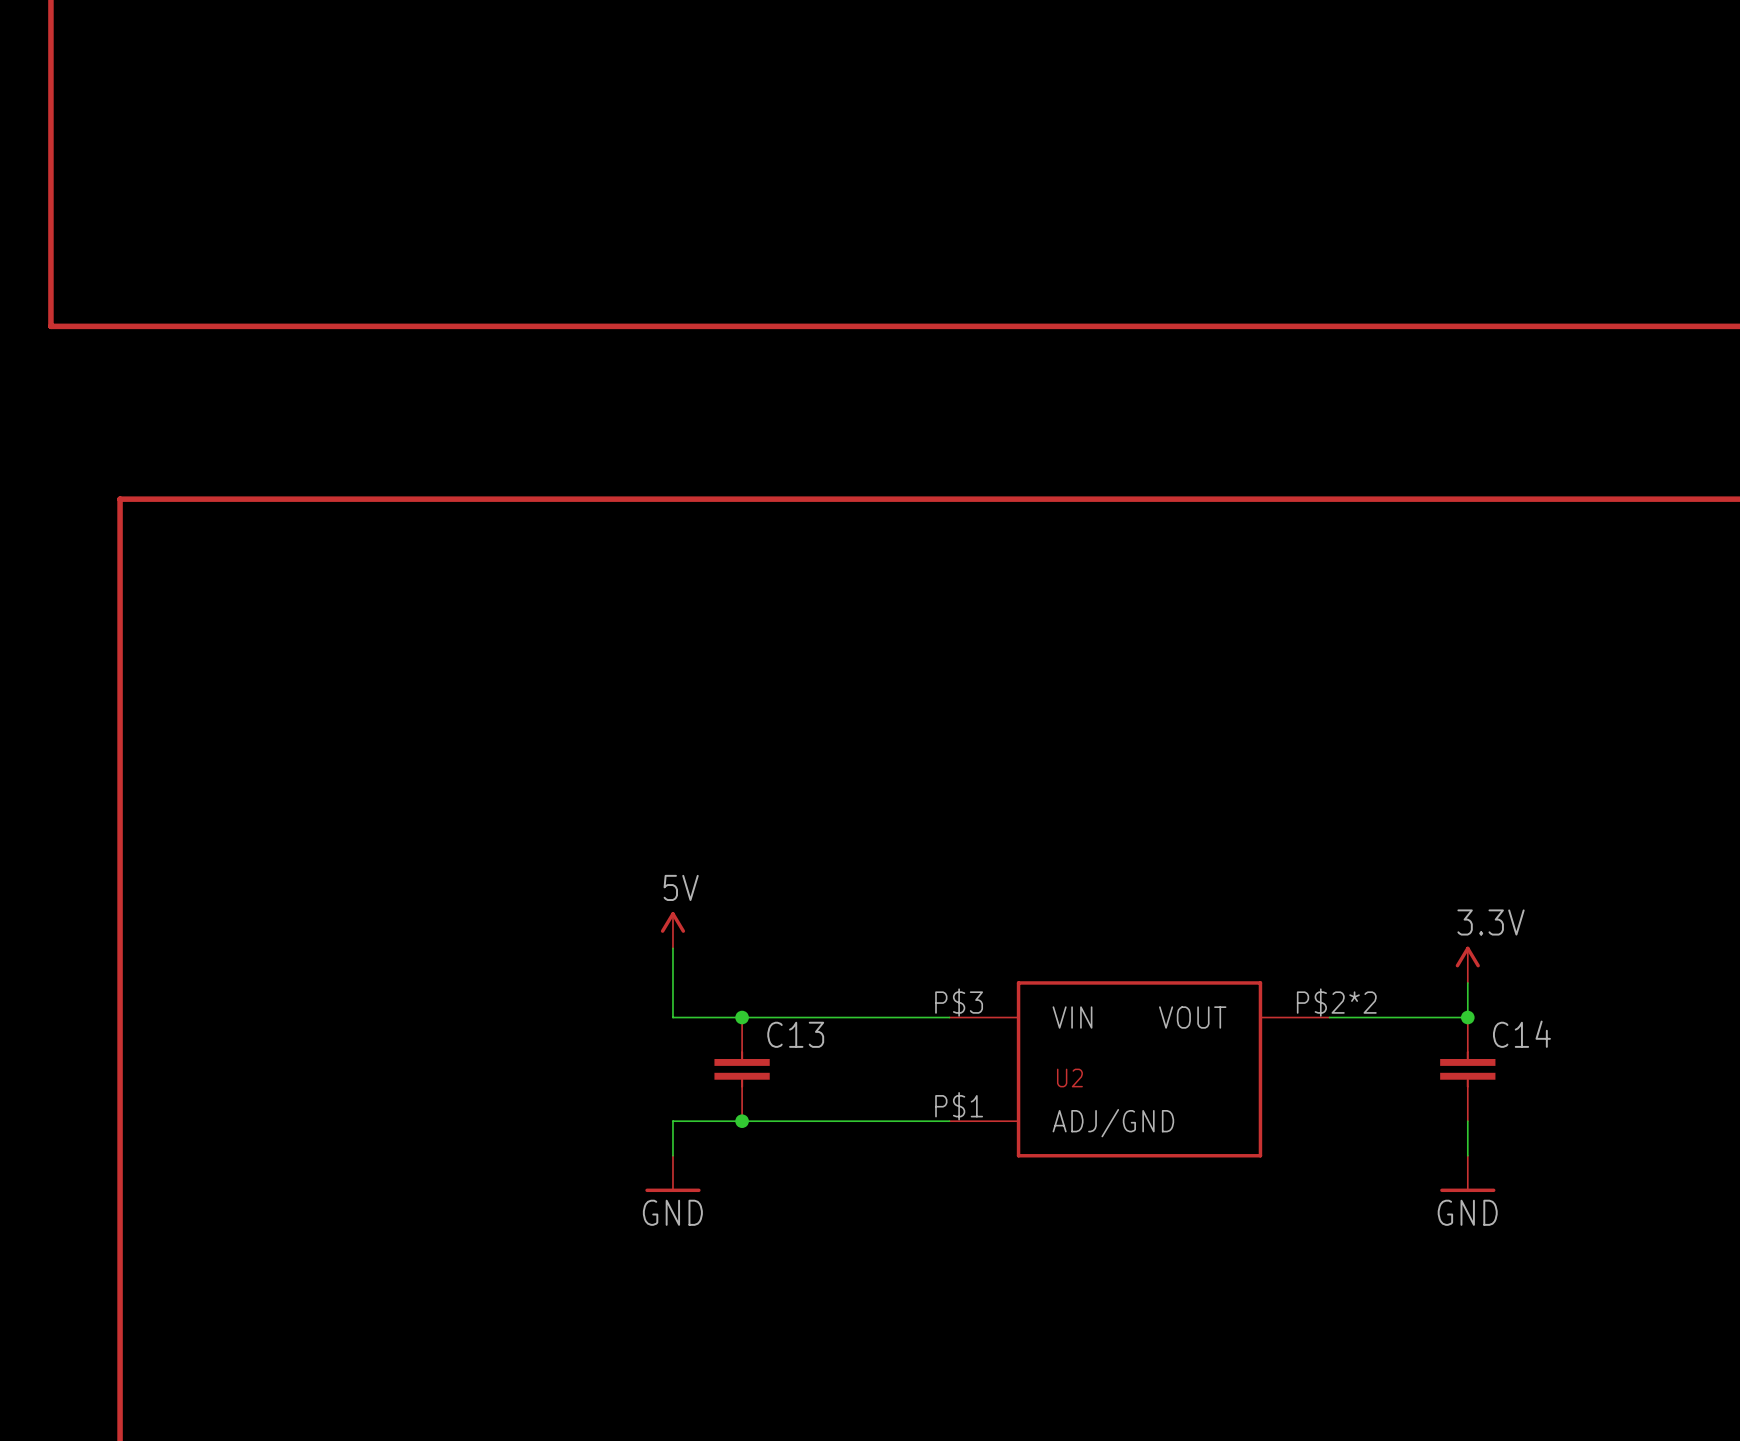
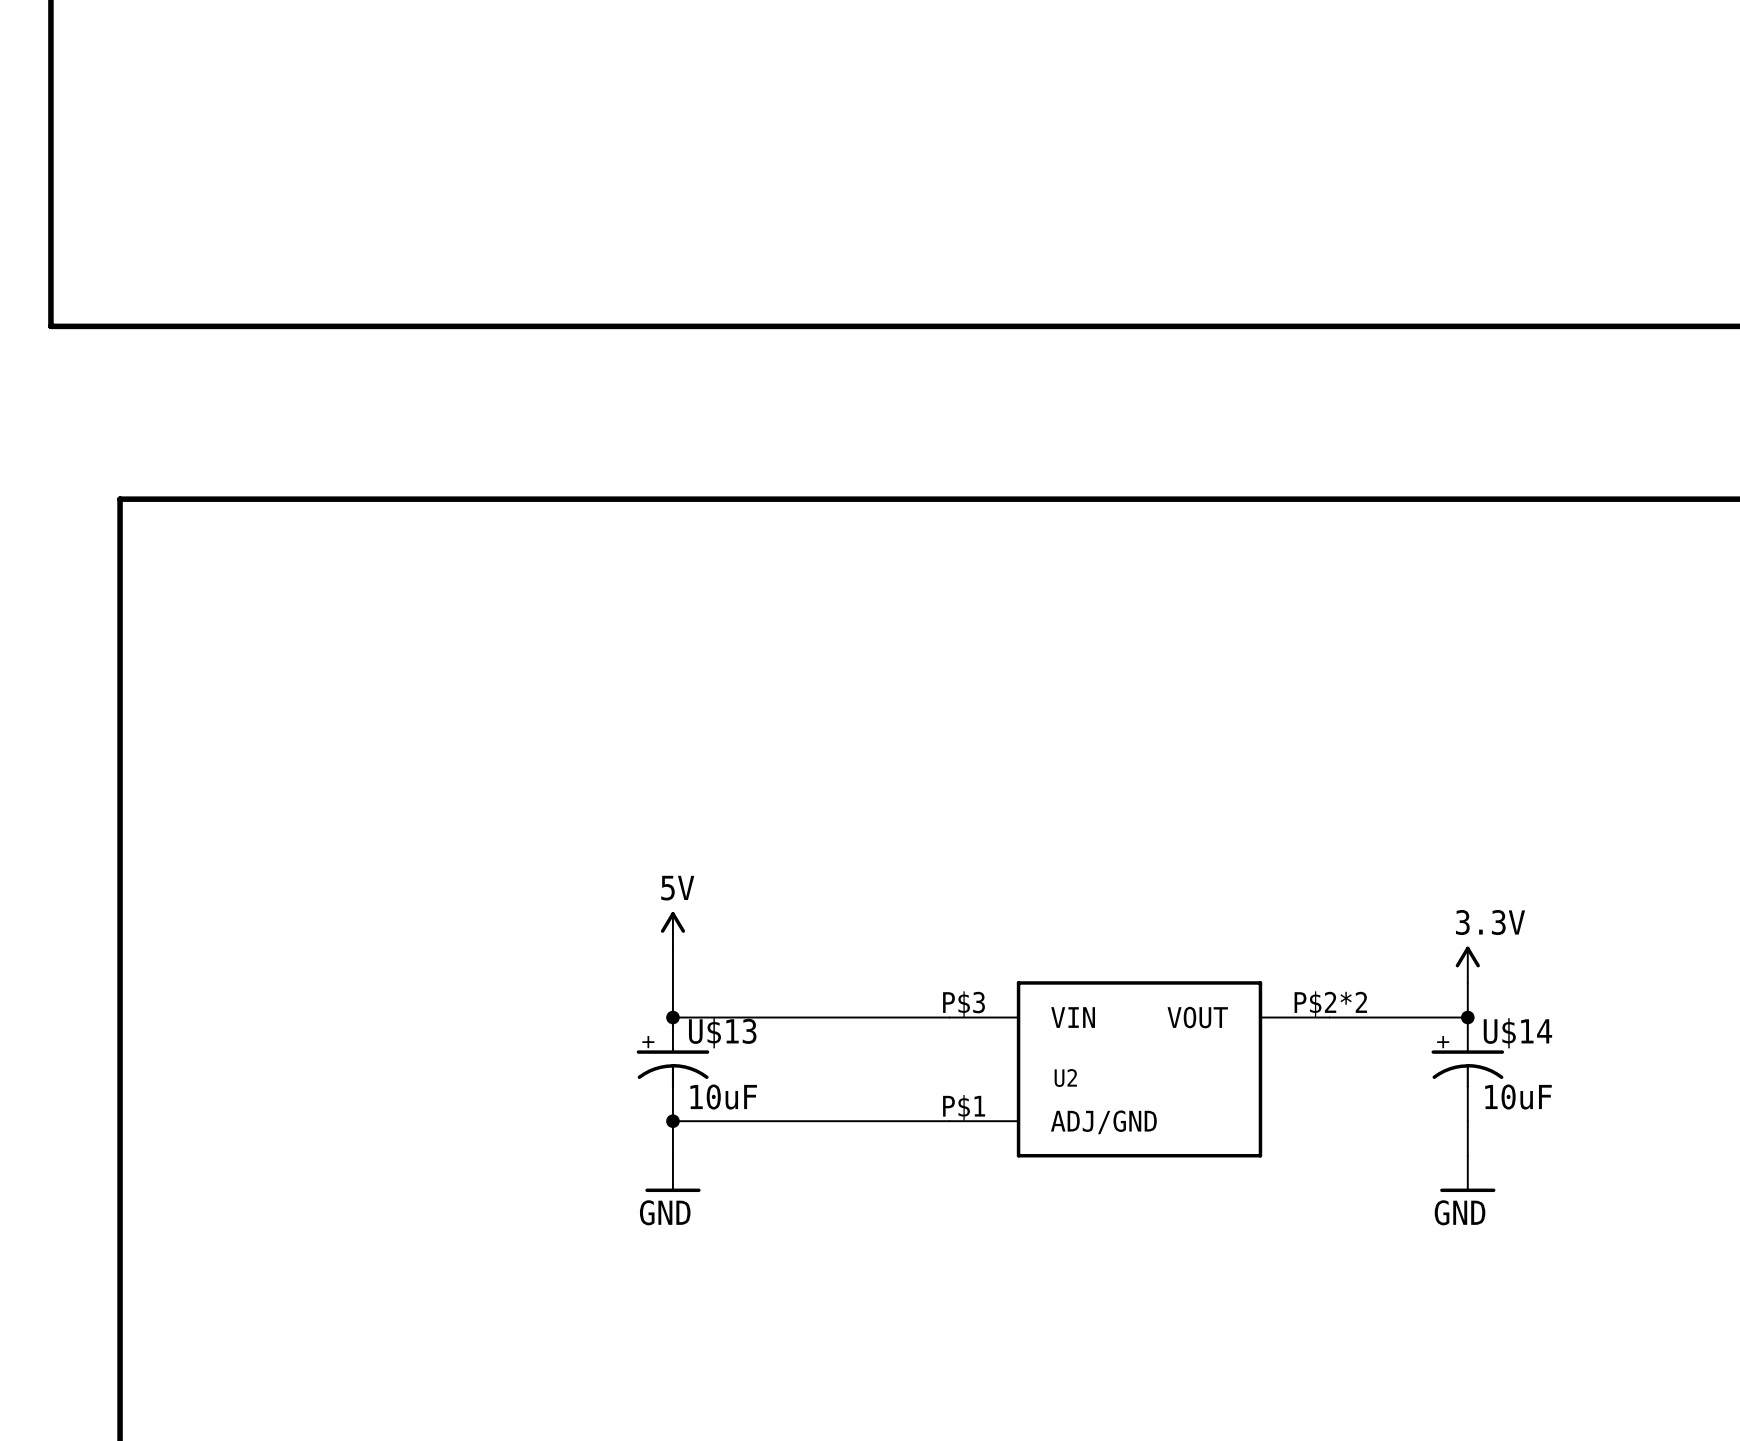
junction: none -> (672, 1017)
junction: (742, 1017) -> none
U$13: none -> 10uF (672, 1069)
C13: (742, 1069) -> none
C14: (1467, 1069) -> none
U$14: none -> 10uF (1467, 1069)
junction: none -> (672, 1121)
junction: (742, 1121) -> none

